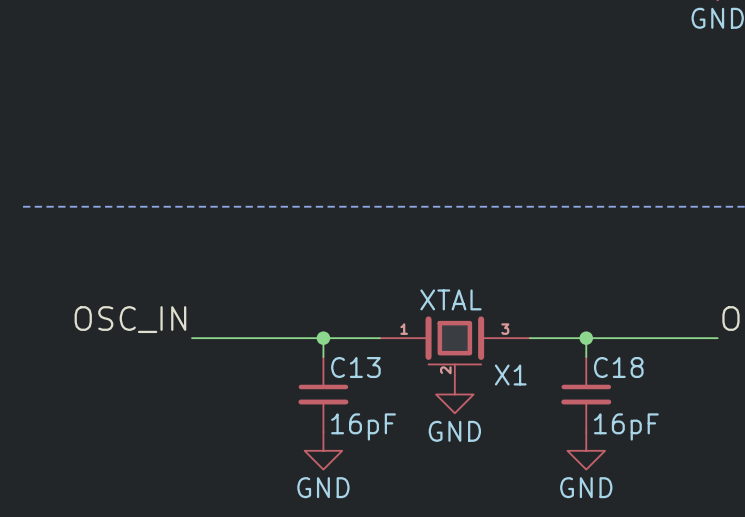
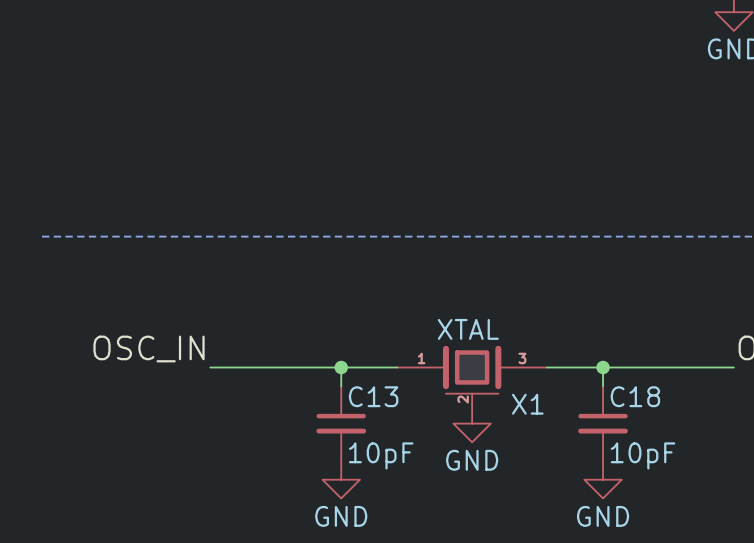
C13 value: 16pF (363, 426) -> 10pF (381, 455)
C18 value: 16pF (626, 426) -> 10pF (642, 455)

